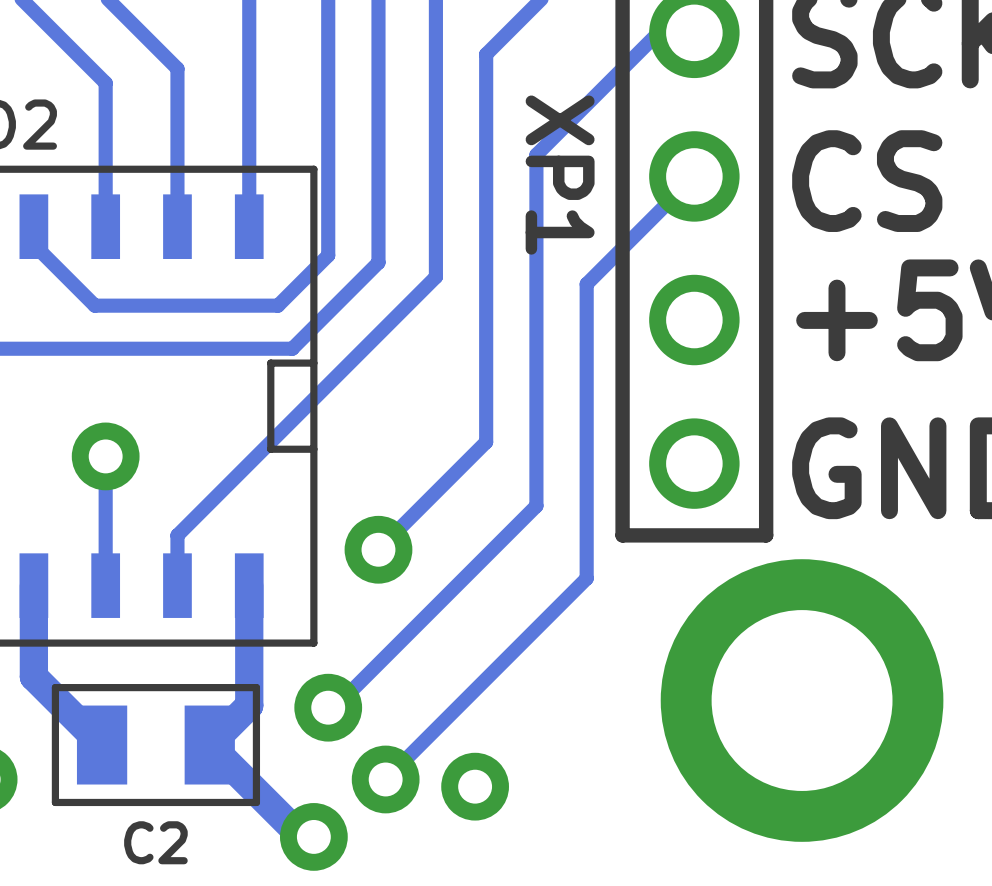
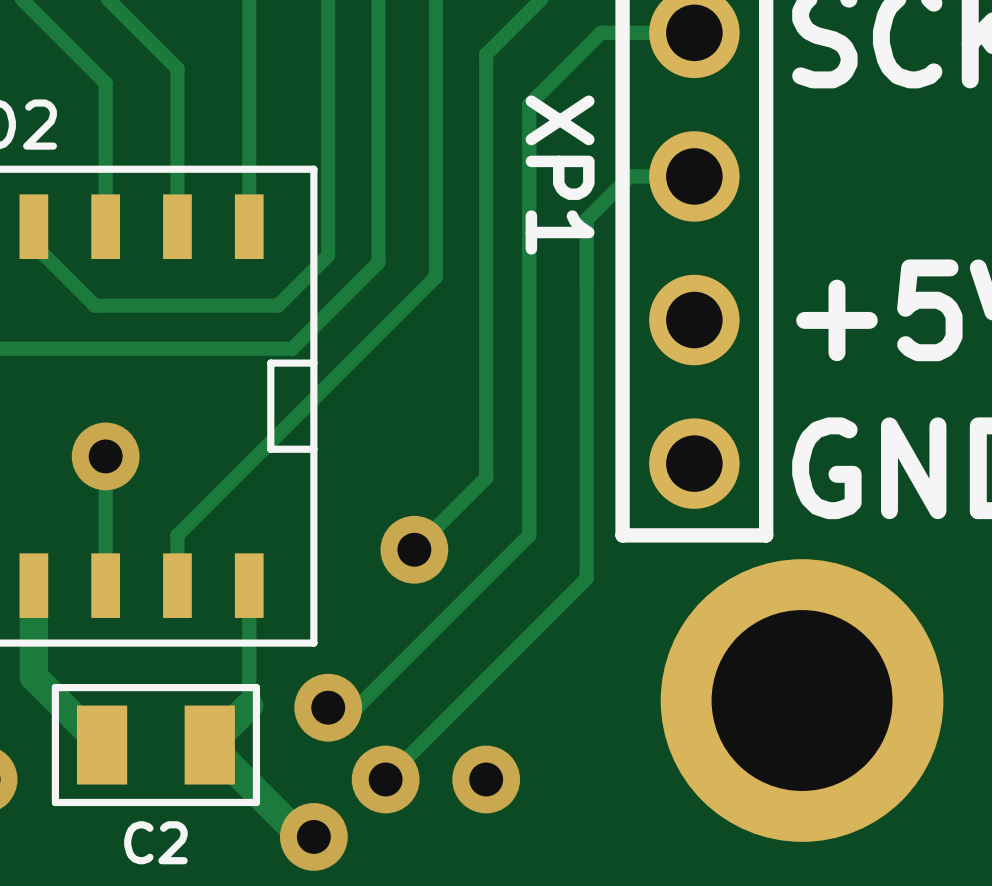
track: (658, 32) (536, 154) (536, 505) (334, 707) -> (658, 32) (601, 32) (529, 104) (529, 535) (356, 707) (334, 707)
track: (694, 176) (586, 284) -> (694, 176) (629, 176) (586, 219) (586, 284)
text: CS (867, 181) -> none
track: (486, 442) (378, 549) (400, 549) -> (486, 442) (486, 477) (414, 549)
via position: (378, 549) -> (414, 549)
track width: thick (249, 585) (249, 705) -> thin (249, 585) (249, 705)
via position: (475, 786) -> (486, 779)

